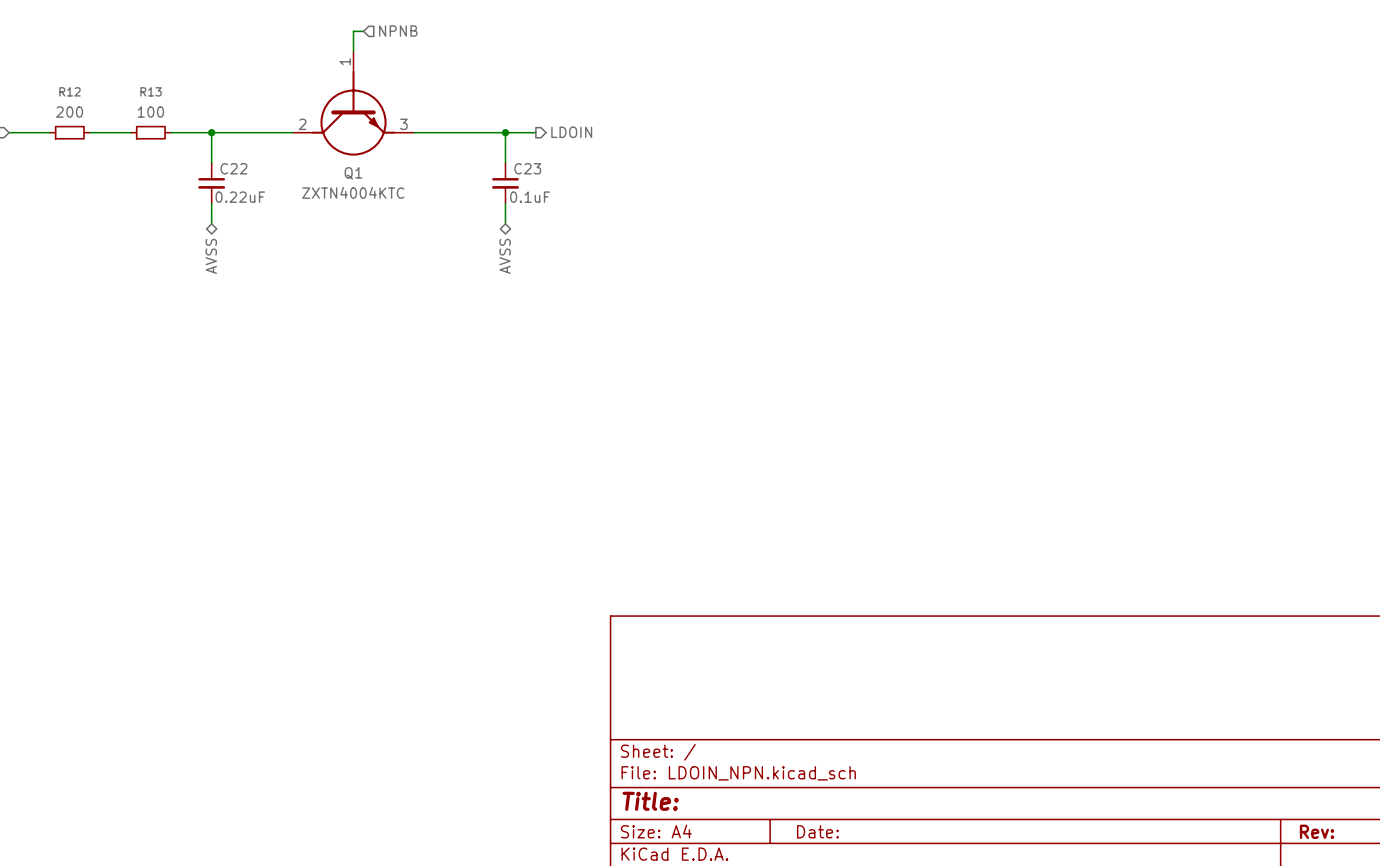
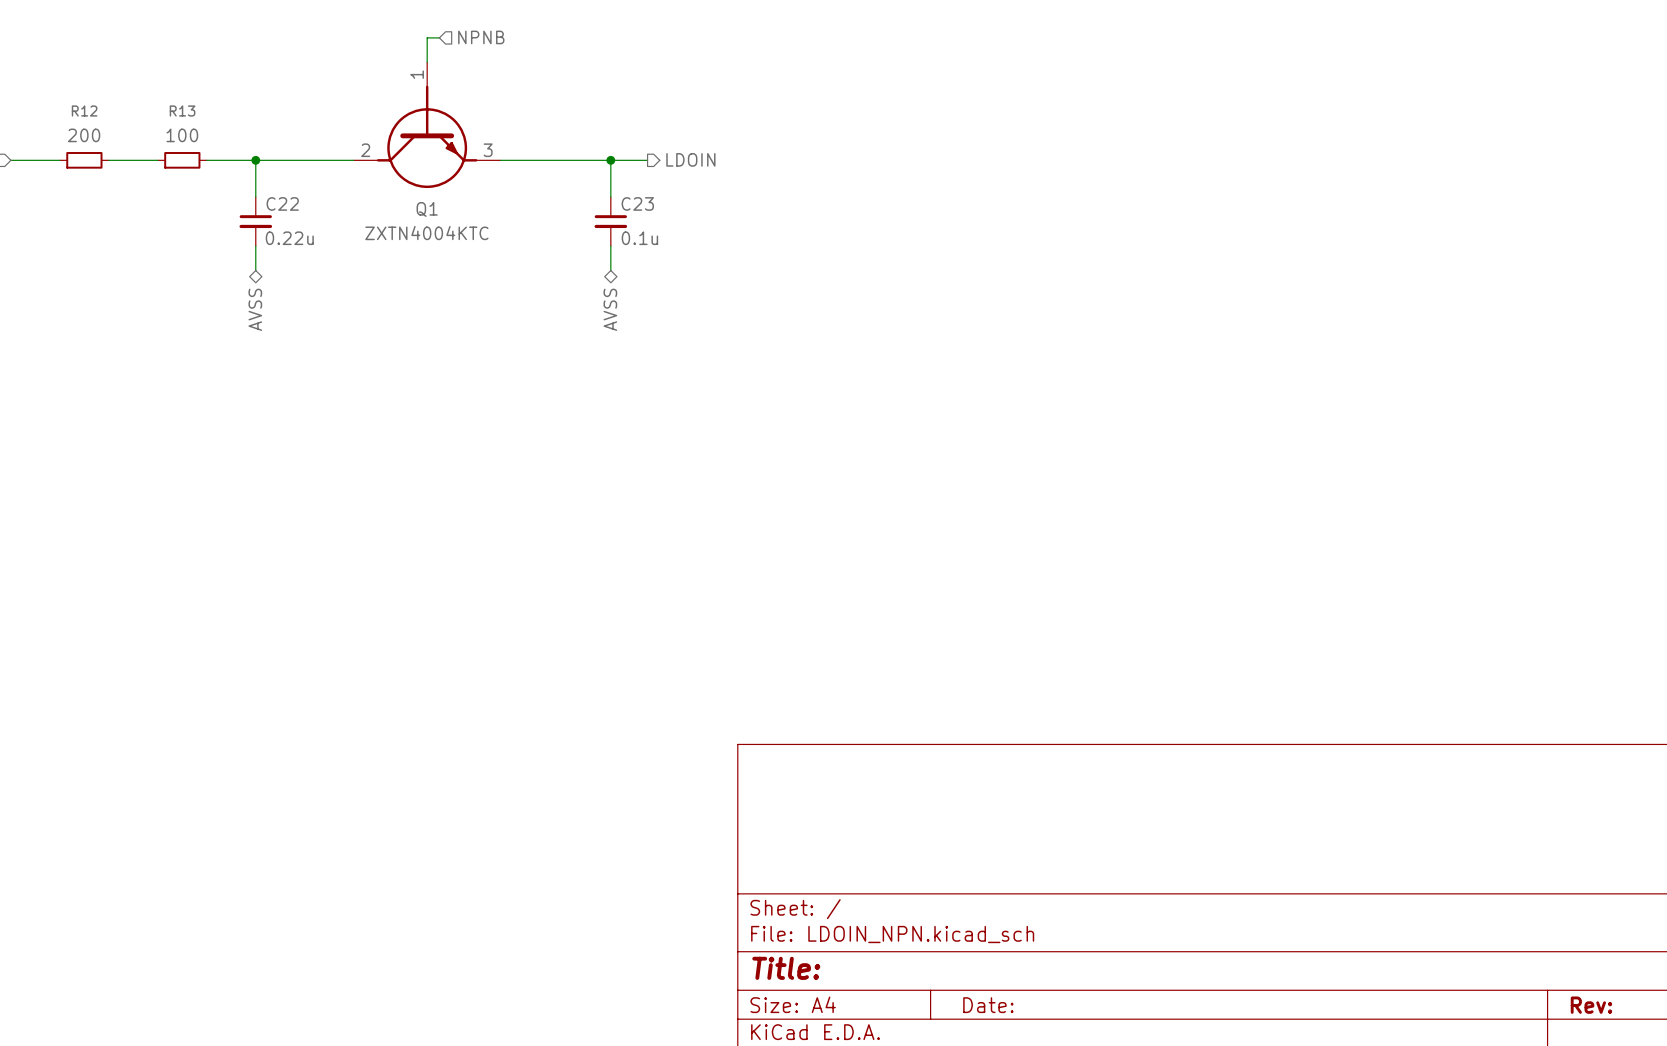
C22 value: 0.22uF (240, 197) -> 0.22u (289, 238)
C23 value: 0.1uF (530, 197) -> 0.1u (639, 238)

